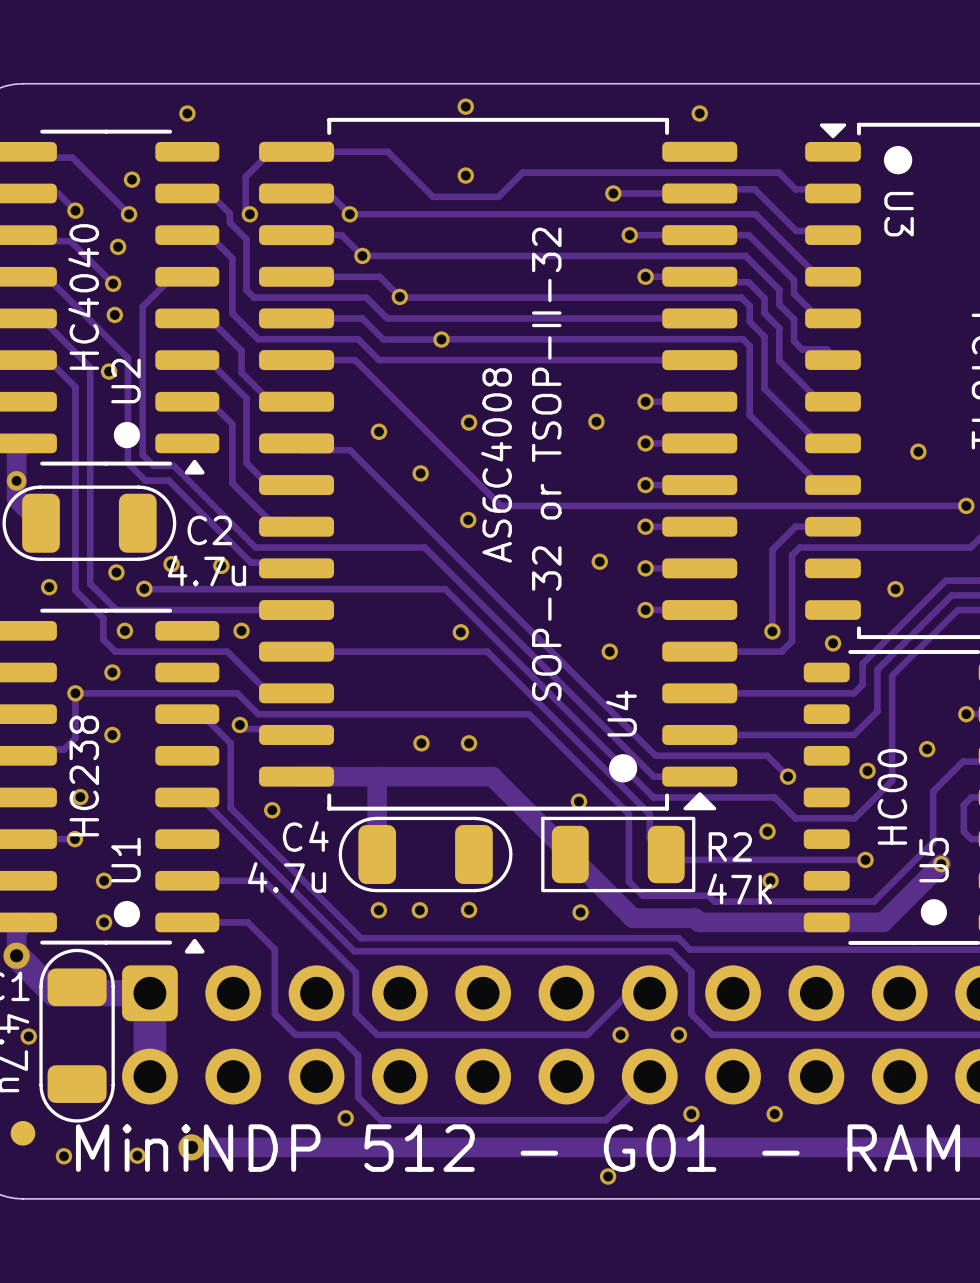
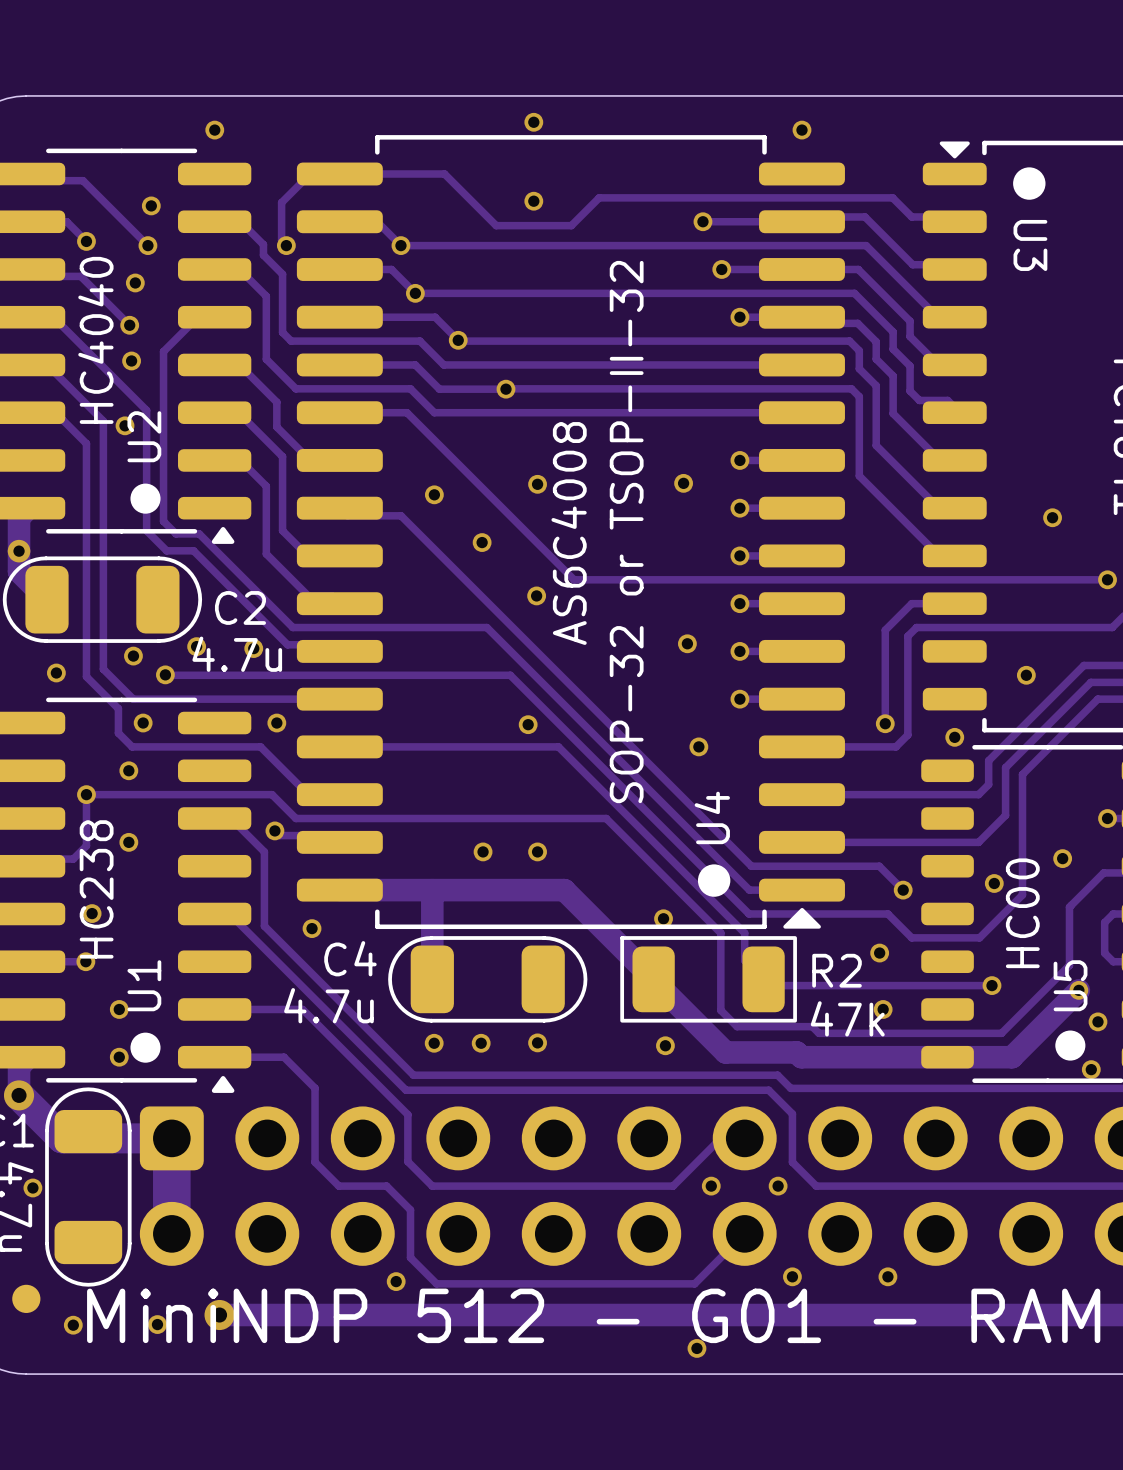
via: none -> (1097, 1021)
via: none -> (1091, 1069)

